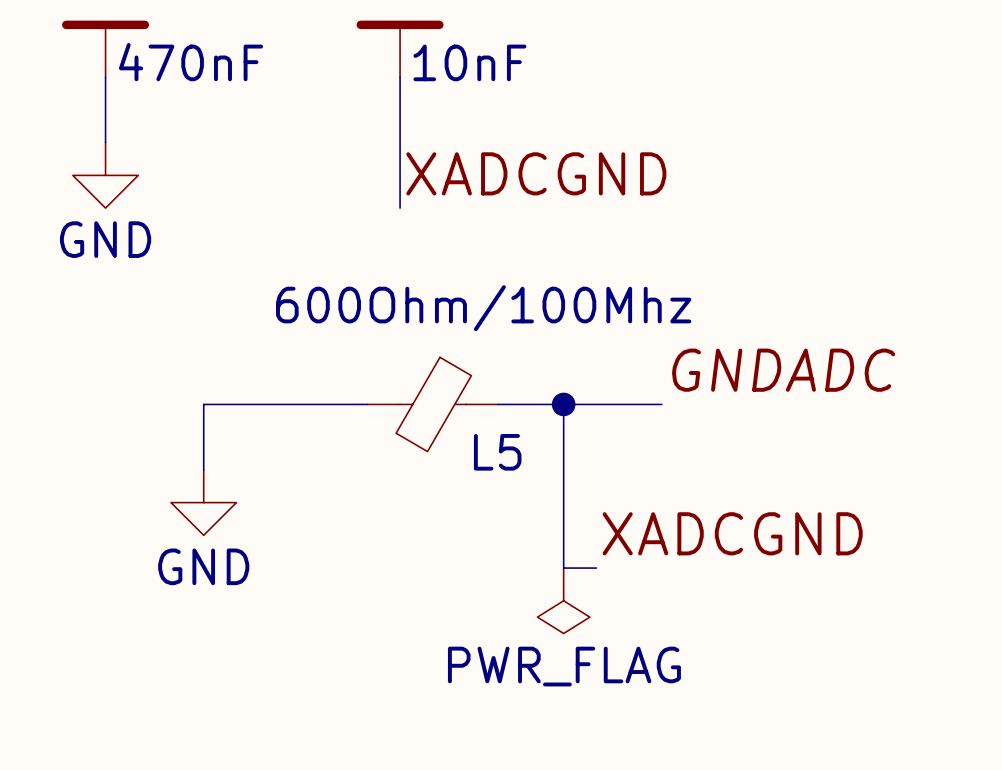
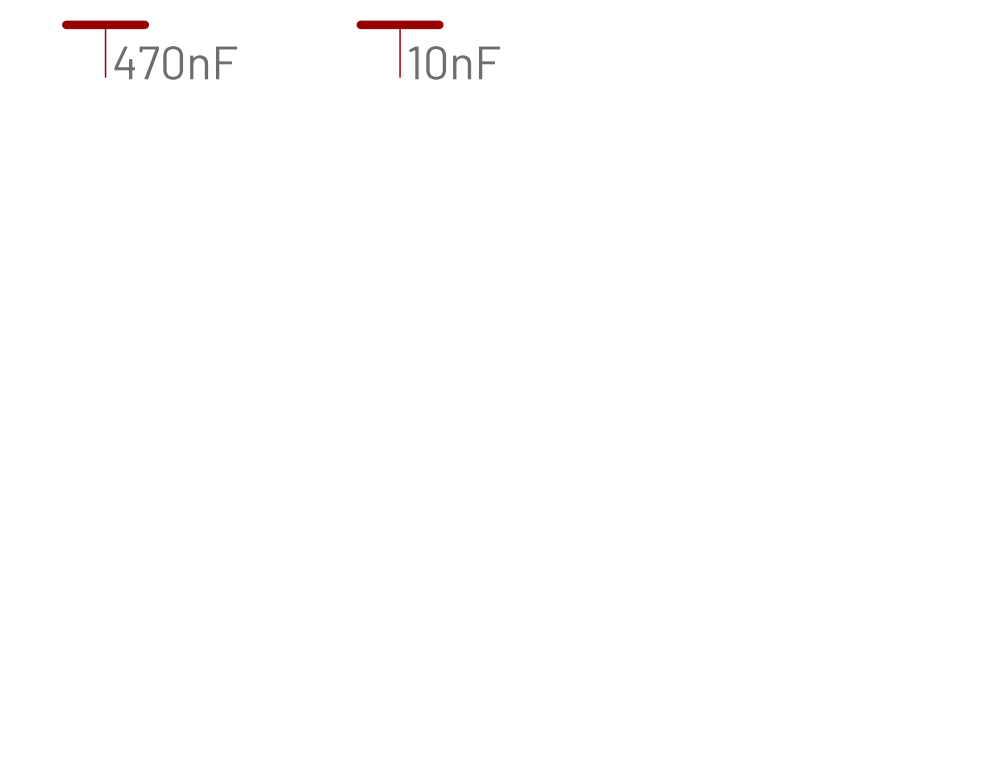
wire: (105, 77) (105, 142) -> none
wire: (400, 77) (400, 208) -> none
label: XADCGND (536, 173) -> none
power symbol: GND (105, 175) -> none
label: GNDADC (783, 370) -> none
wire: (367, 404) (203, 404) (203, 469) -> none
L5: 600Ohm/100Mhz (432, 404) -> none
wire: (498, 404) (661, 404) -> none
wire: (563, 404) (563, 568) (596, 568) -> none
junction: (563, 404) -> none
power symbol: GND (203, 502) -> none
label: XADCGND (732, 533) -> none
power symbol: PWR_FLAG (563, 600) -> none

